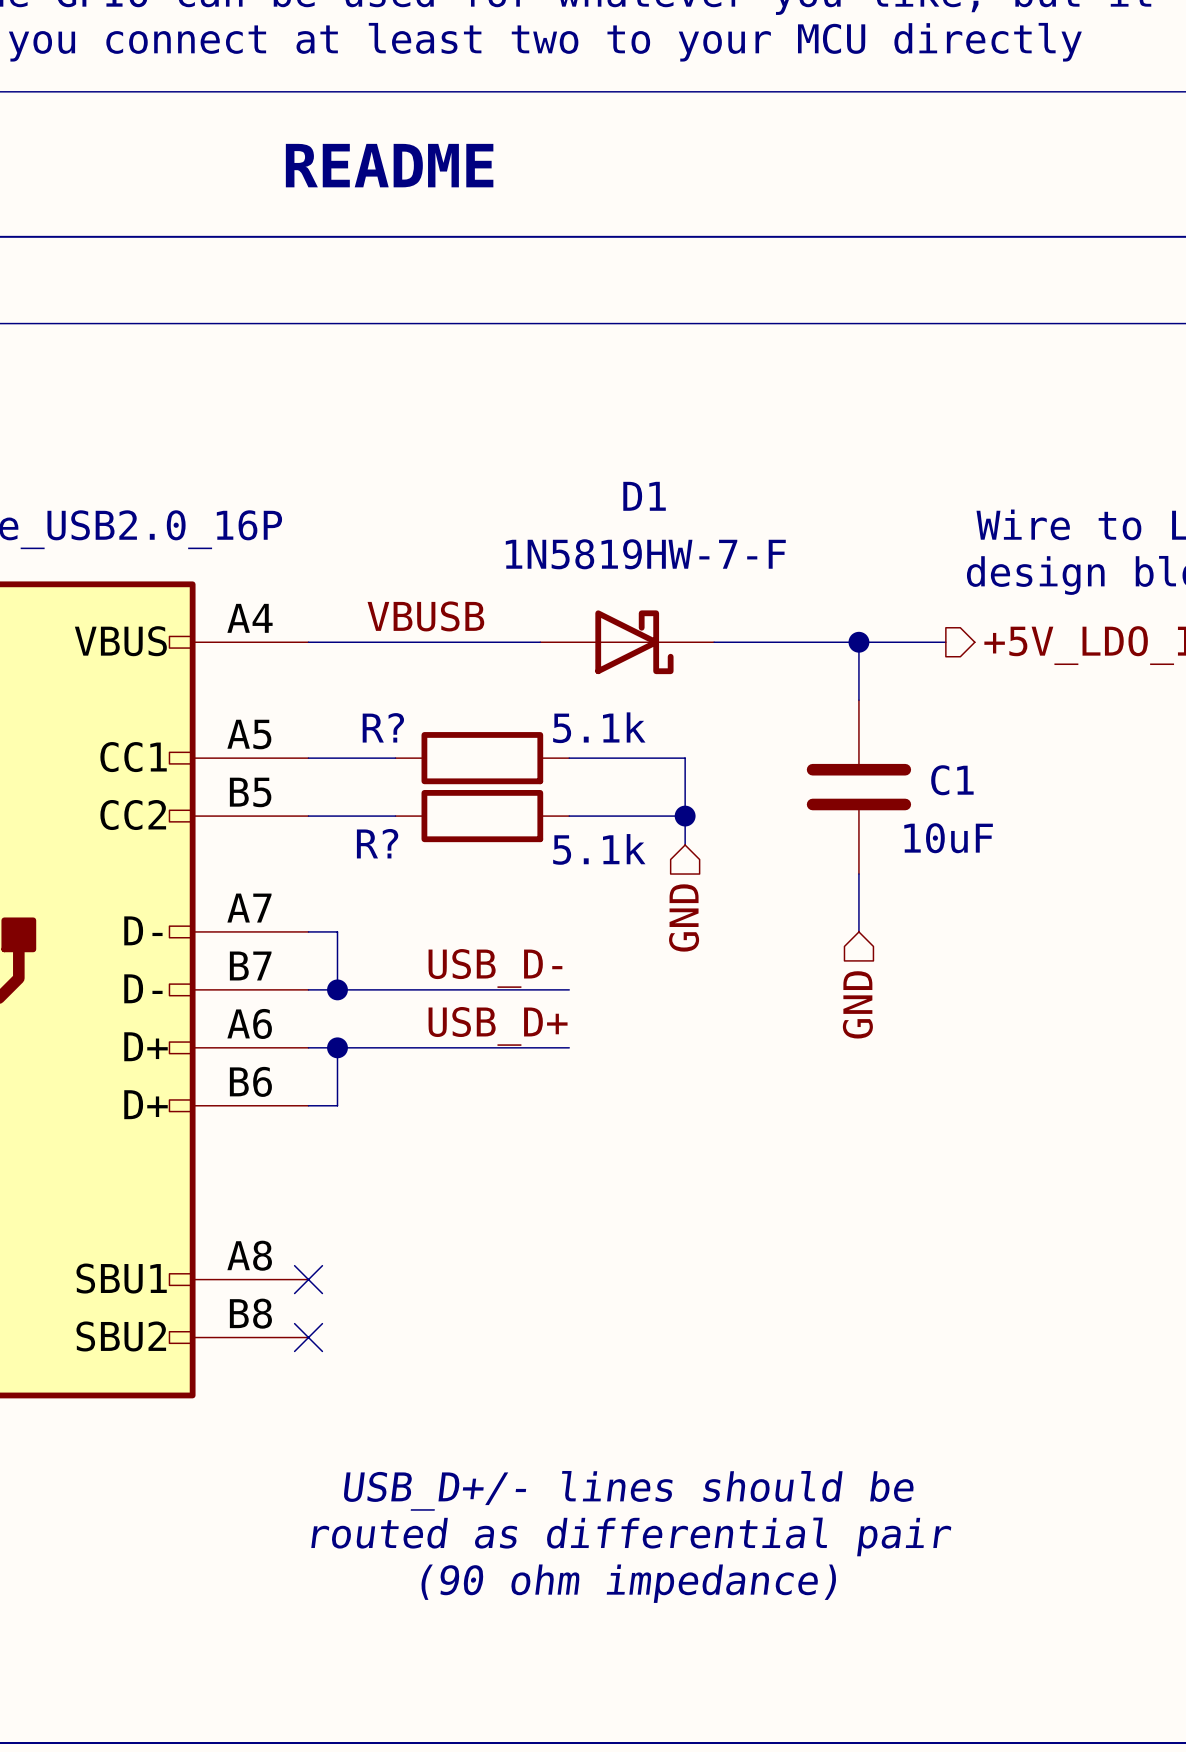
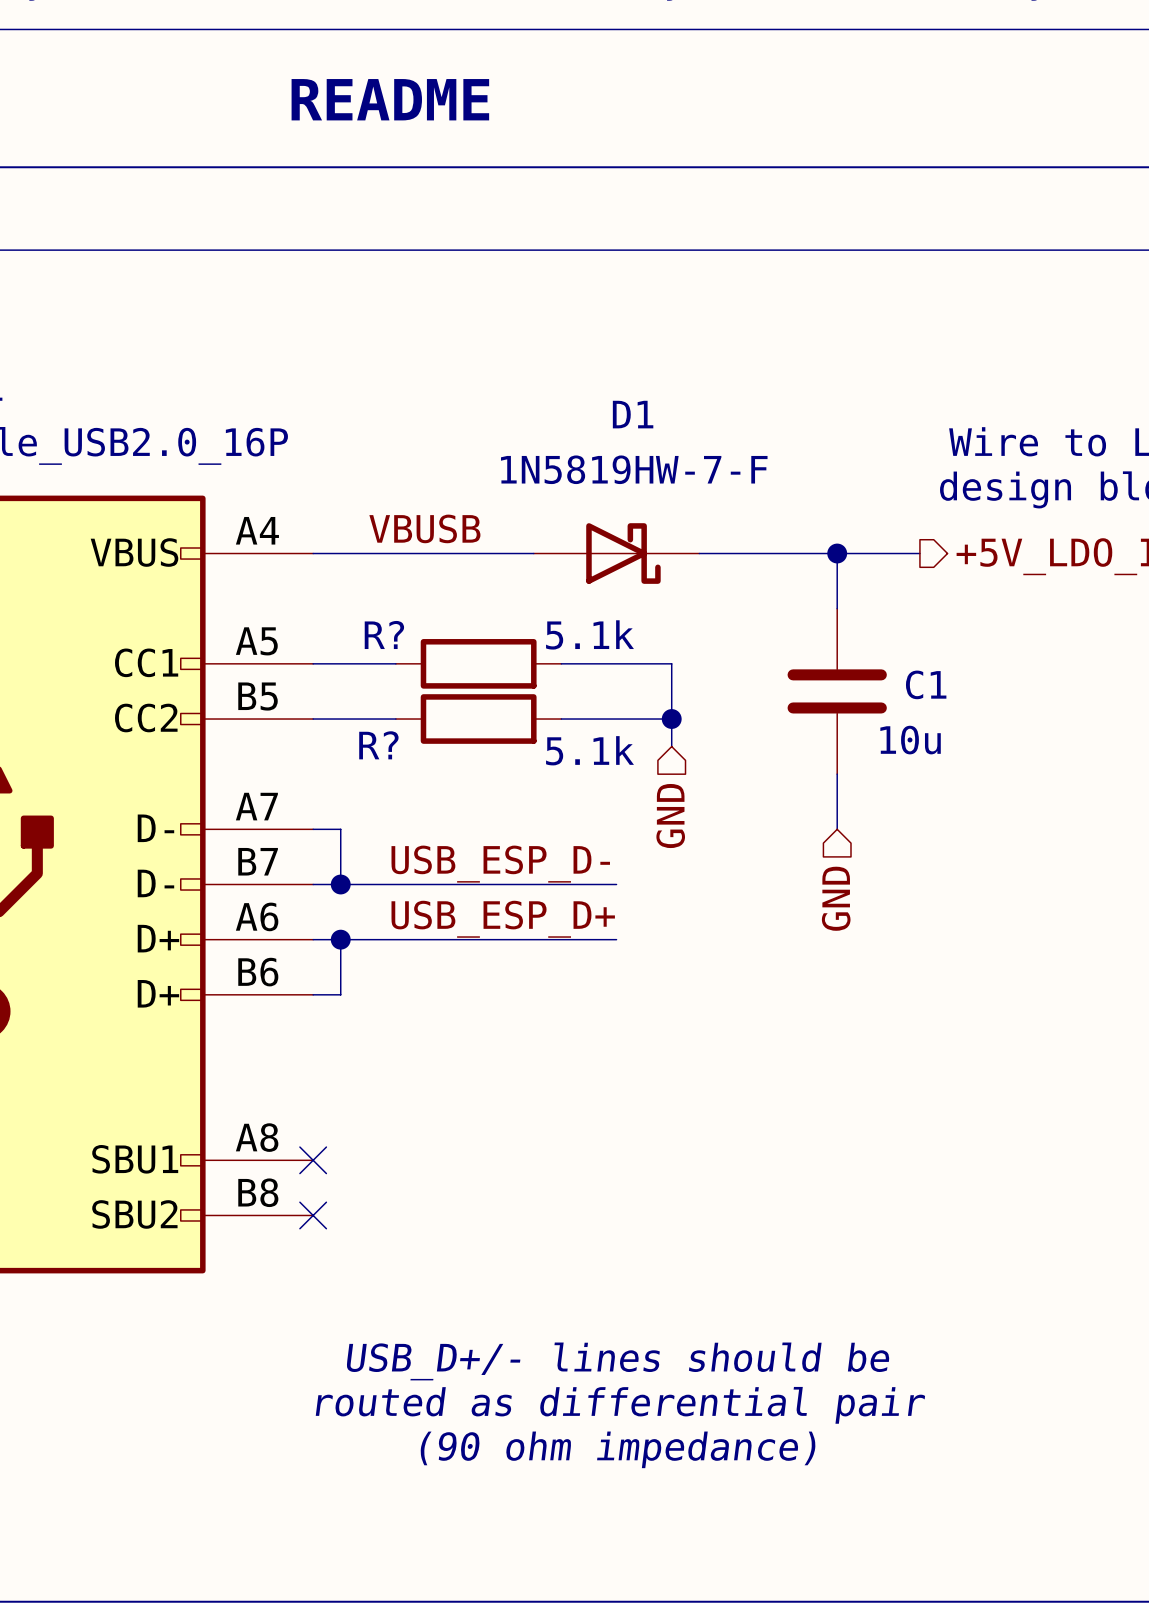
C1 value: 10uF (948, 838) -> 10u (910, 740)
label: USB_D- (495, 968) -> none
label: none -> USB_ESP_D- (500, 864)
wire: none -> (561, 884) (616, 884)
label: USB_D+ (498, 1026) -> none
label: none -> USB_ESP_D+ (503, 919)
wire: none -> (561, 939) (616, 939)

